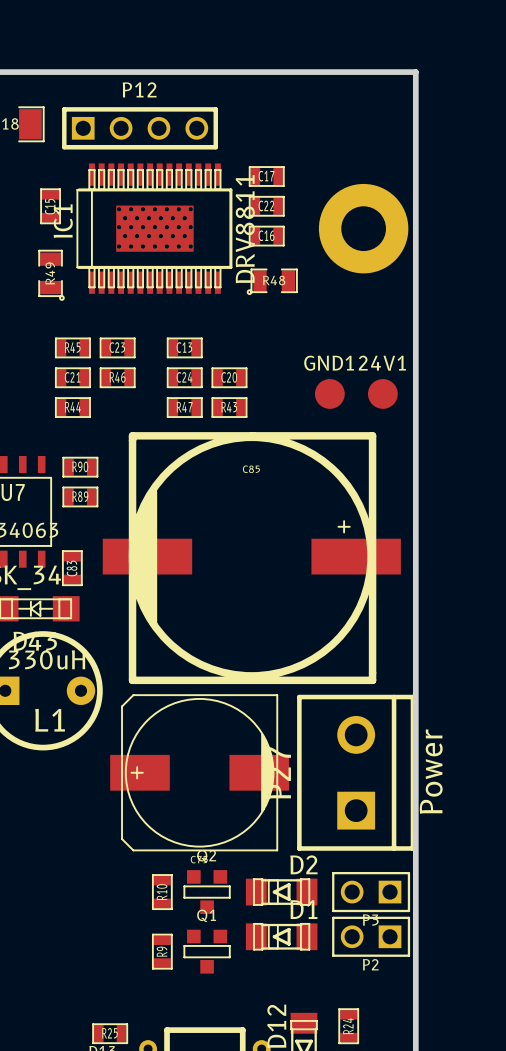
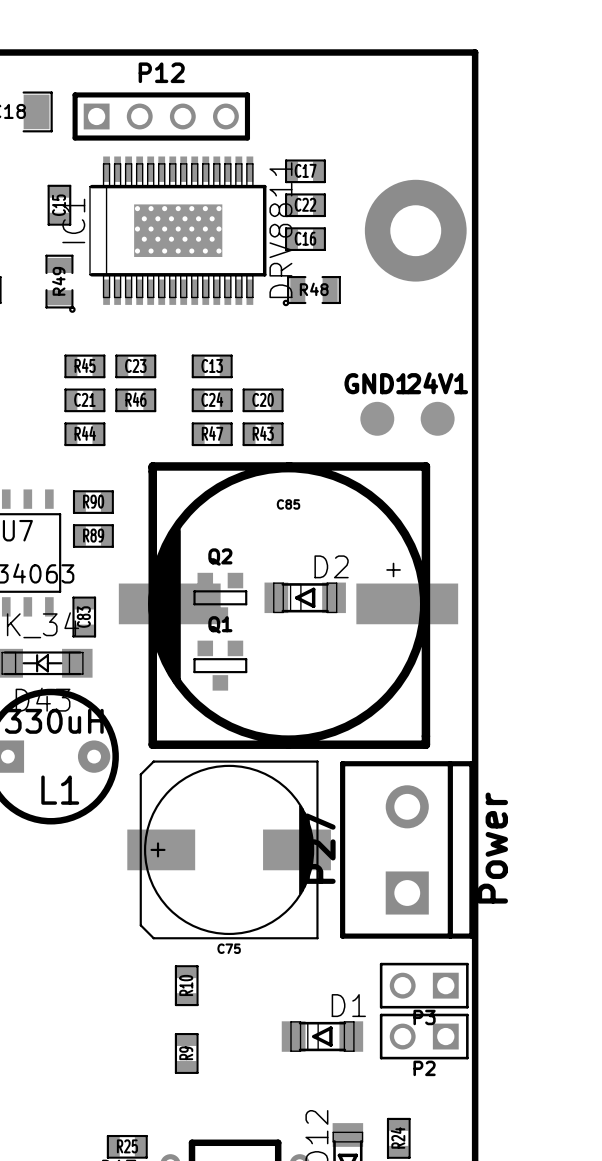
Q2 position: (207, 892) -> (220, 597)
D2 position: (281, 892) -> (305, 597)
Q1 position: (207, 951) -> (220, 665)

